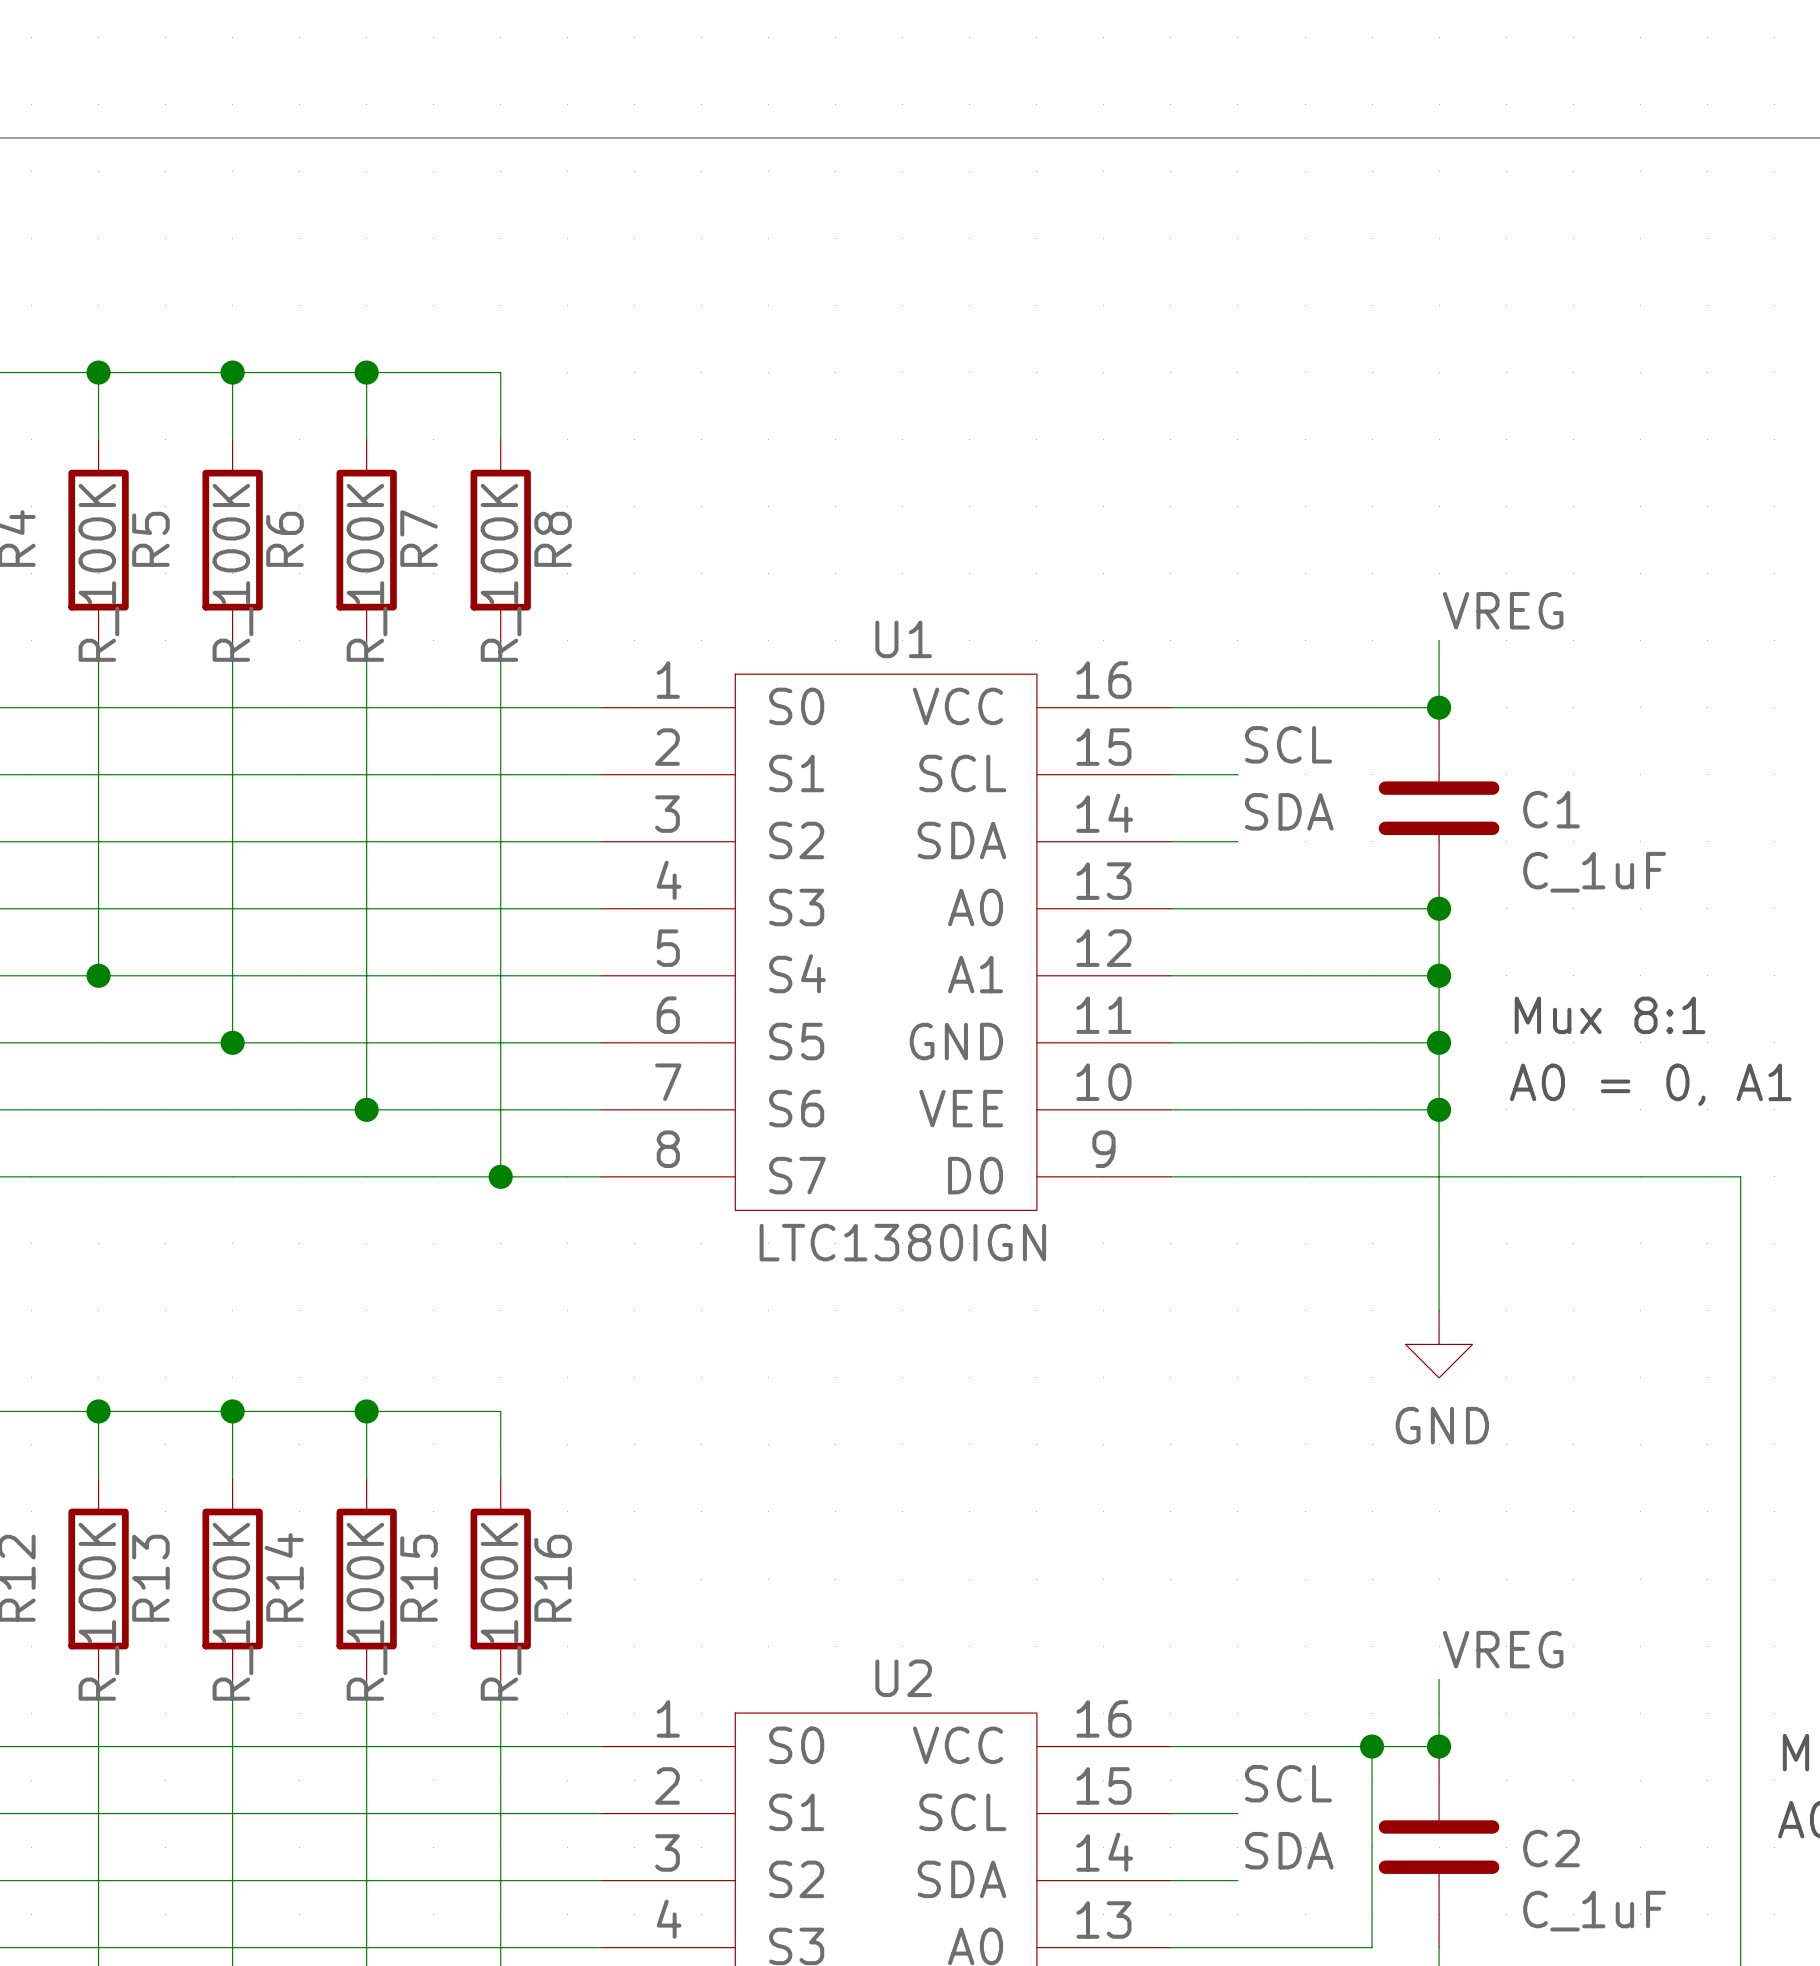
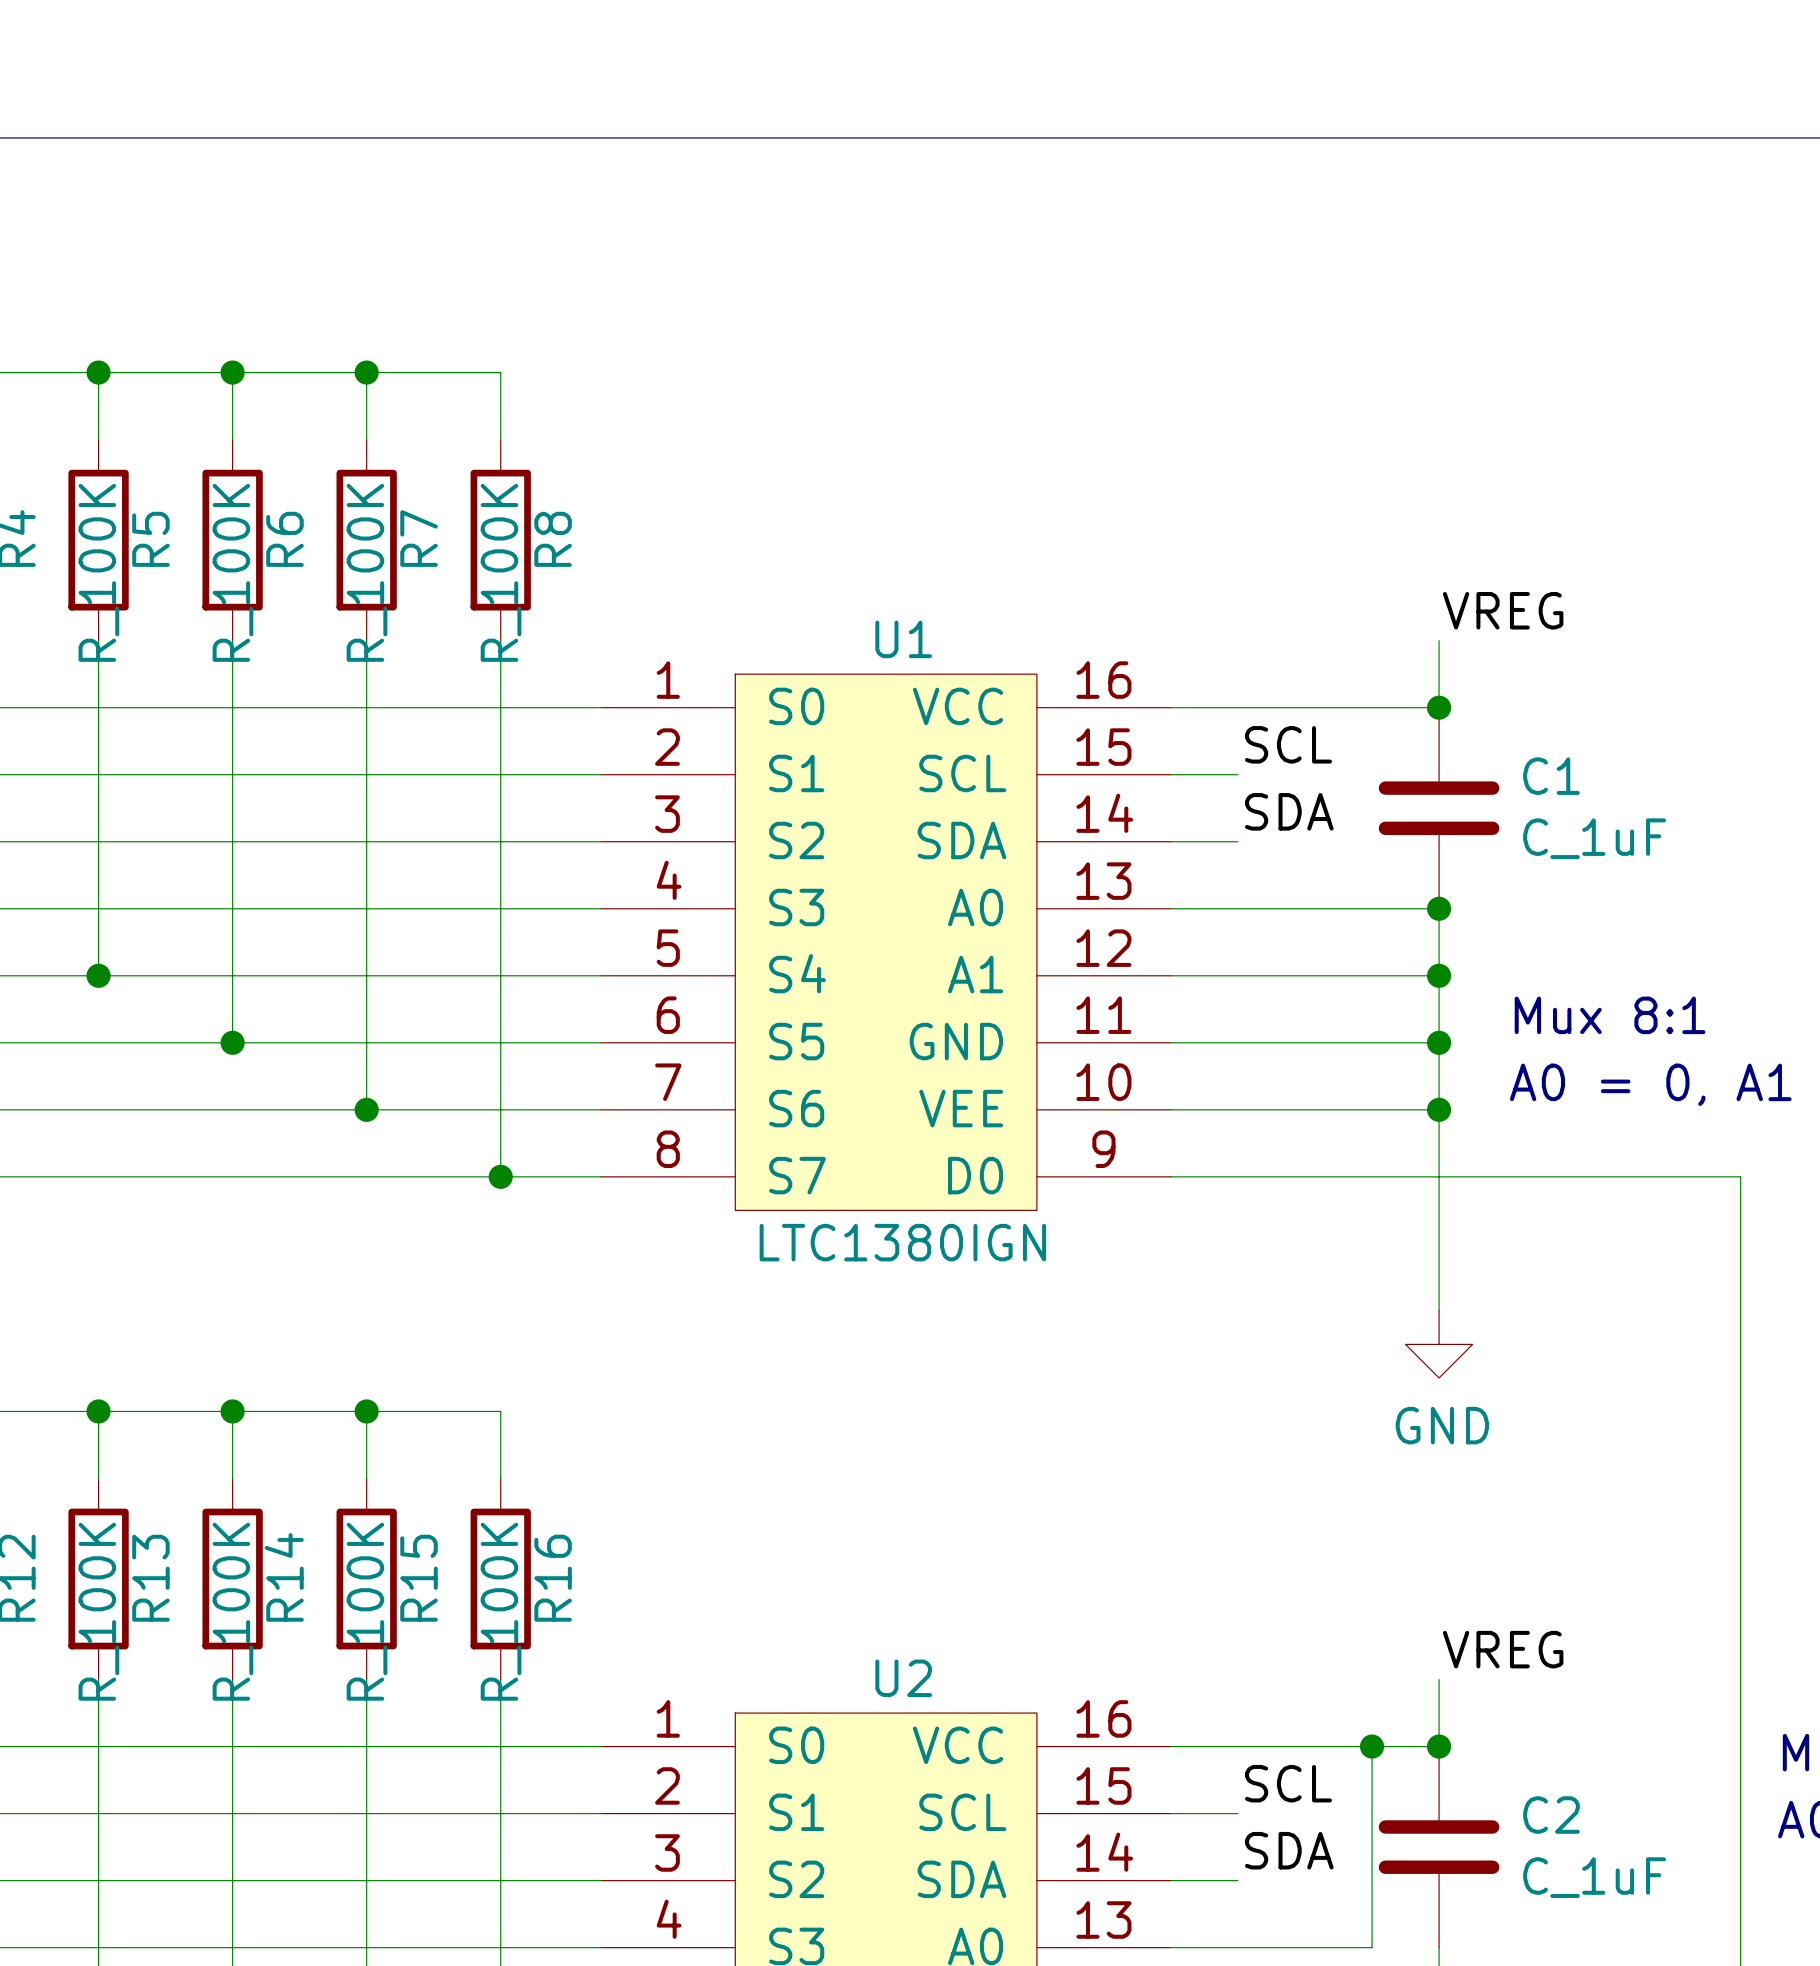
C1 name position: C1 (1551, 809) -> C1 (1551, 776)
C1 value position: C_1uF (1594, 872) -> C_1uF (1594, 838)
C2 name position: C2 (1551, 1848) -> C2 (1551, 1815)
C2 value position: C_1uF (1594, 1911) -> C_1uF (1594, 1877)

